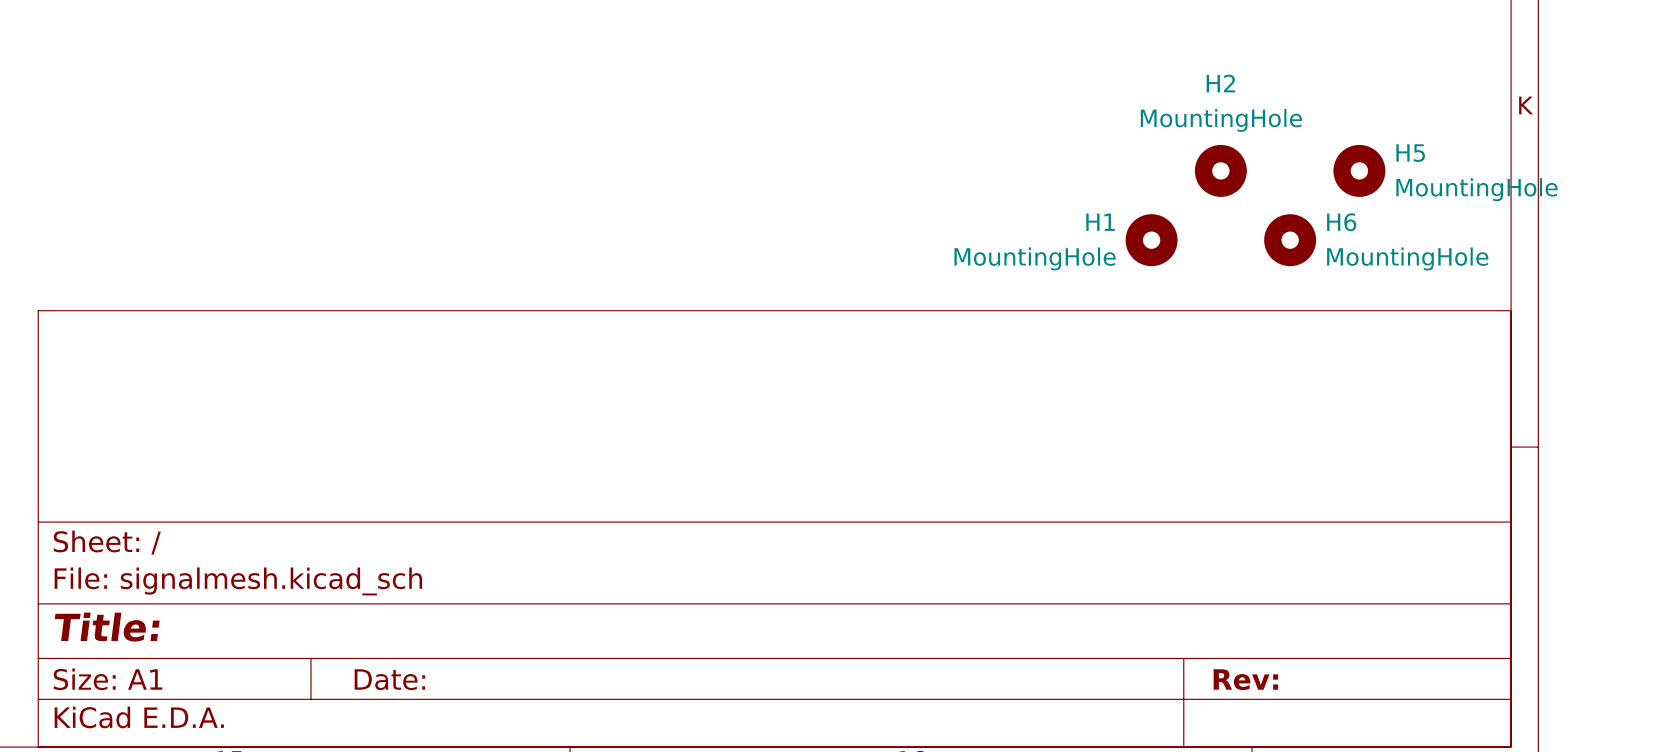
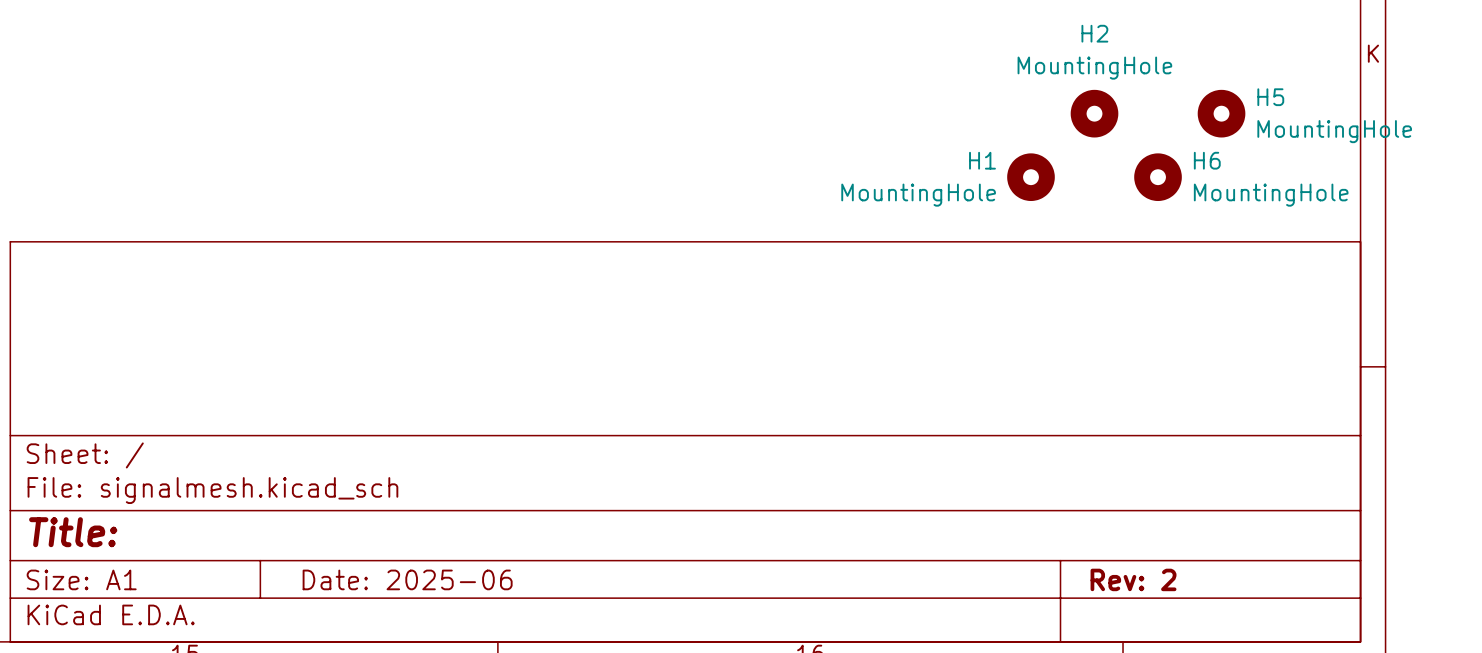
title block: Date: (389, 679) -> Date: 2025-06 (407, 579)
title block: Rev: (1245, 679) -> Rev: 2 (1133, 579)

